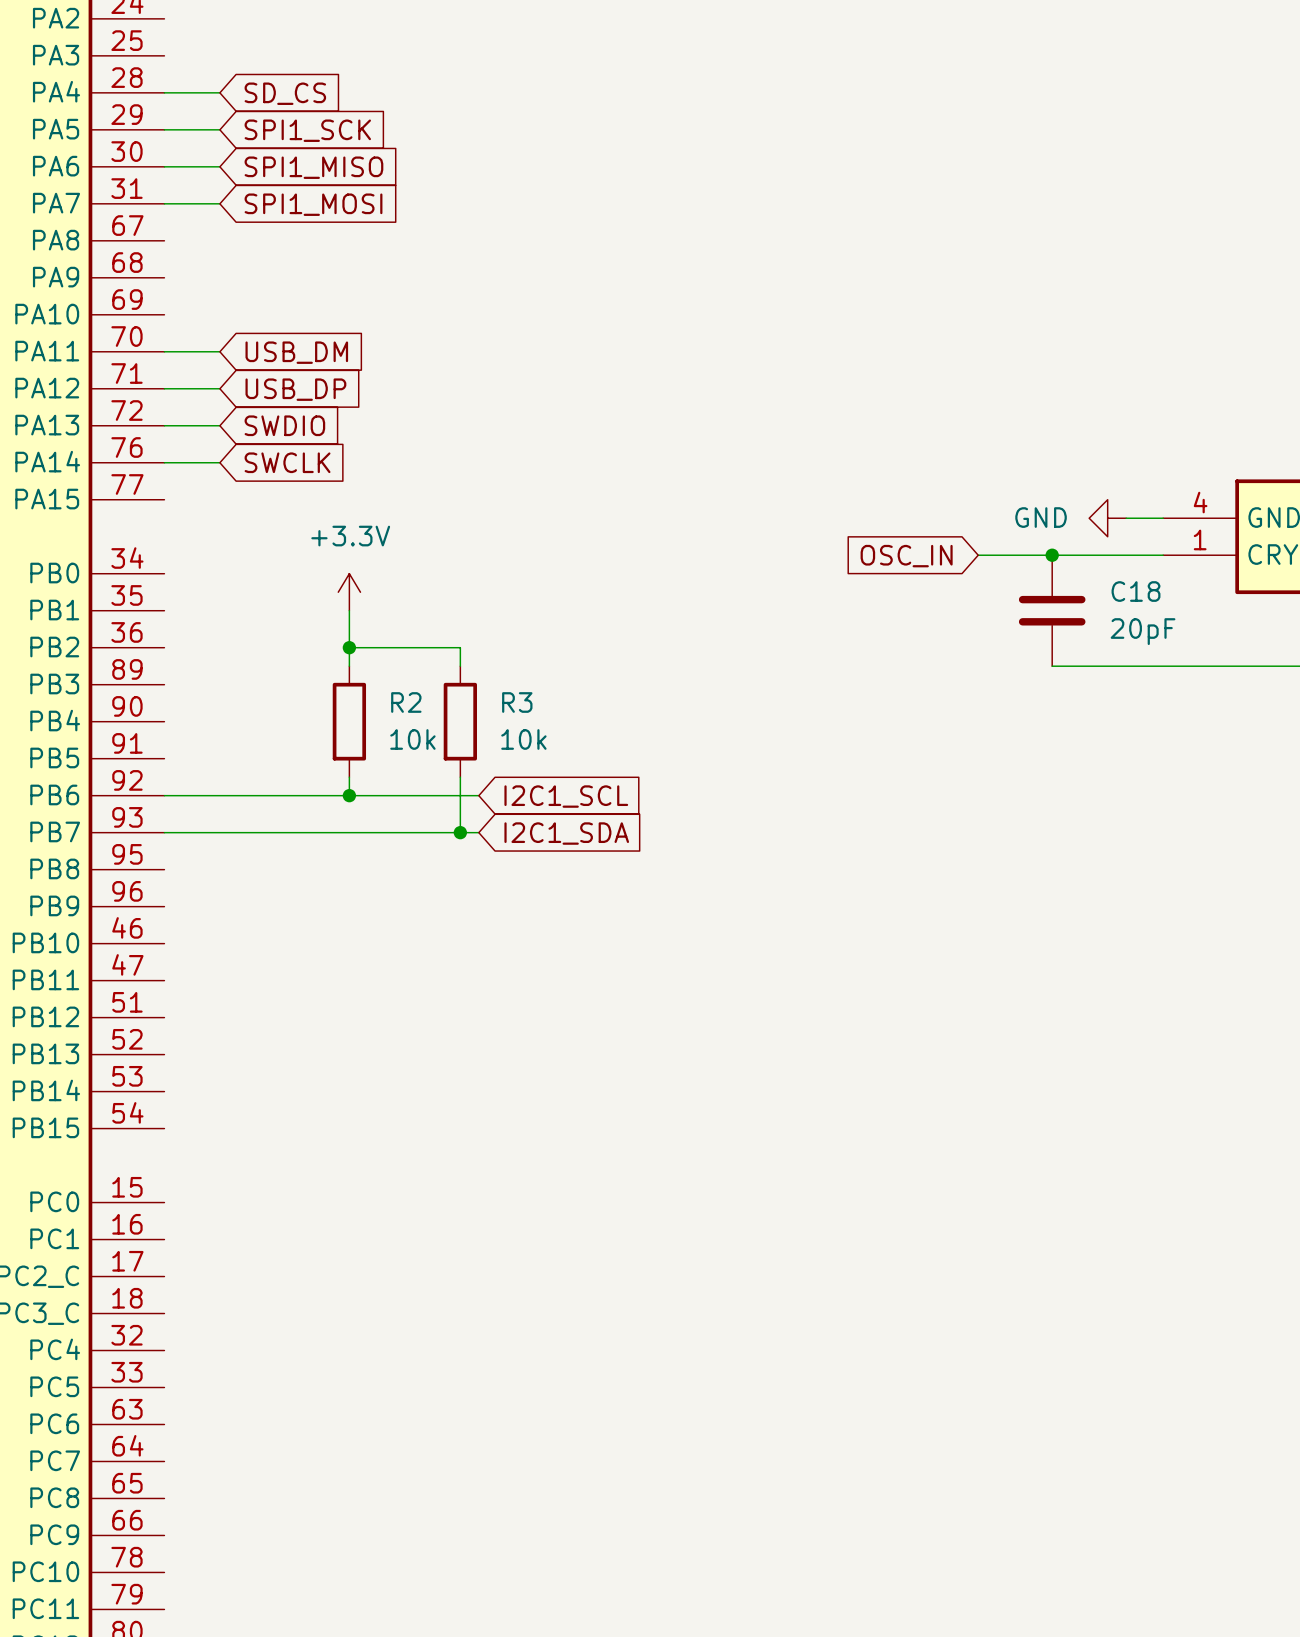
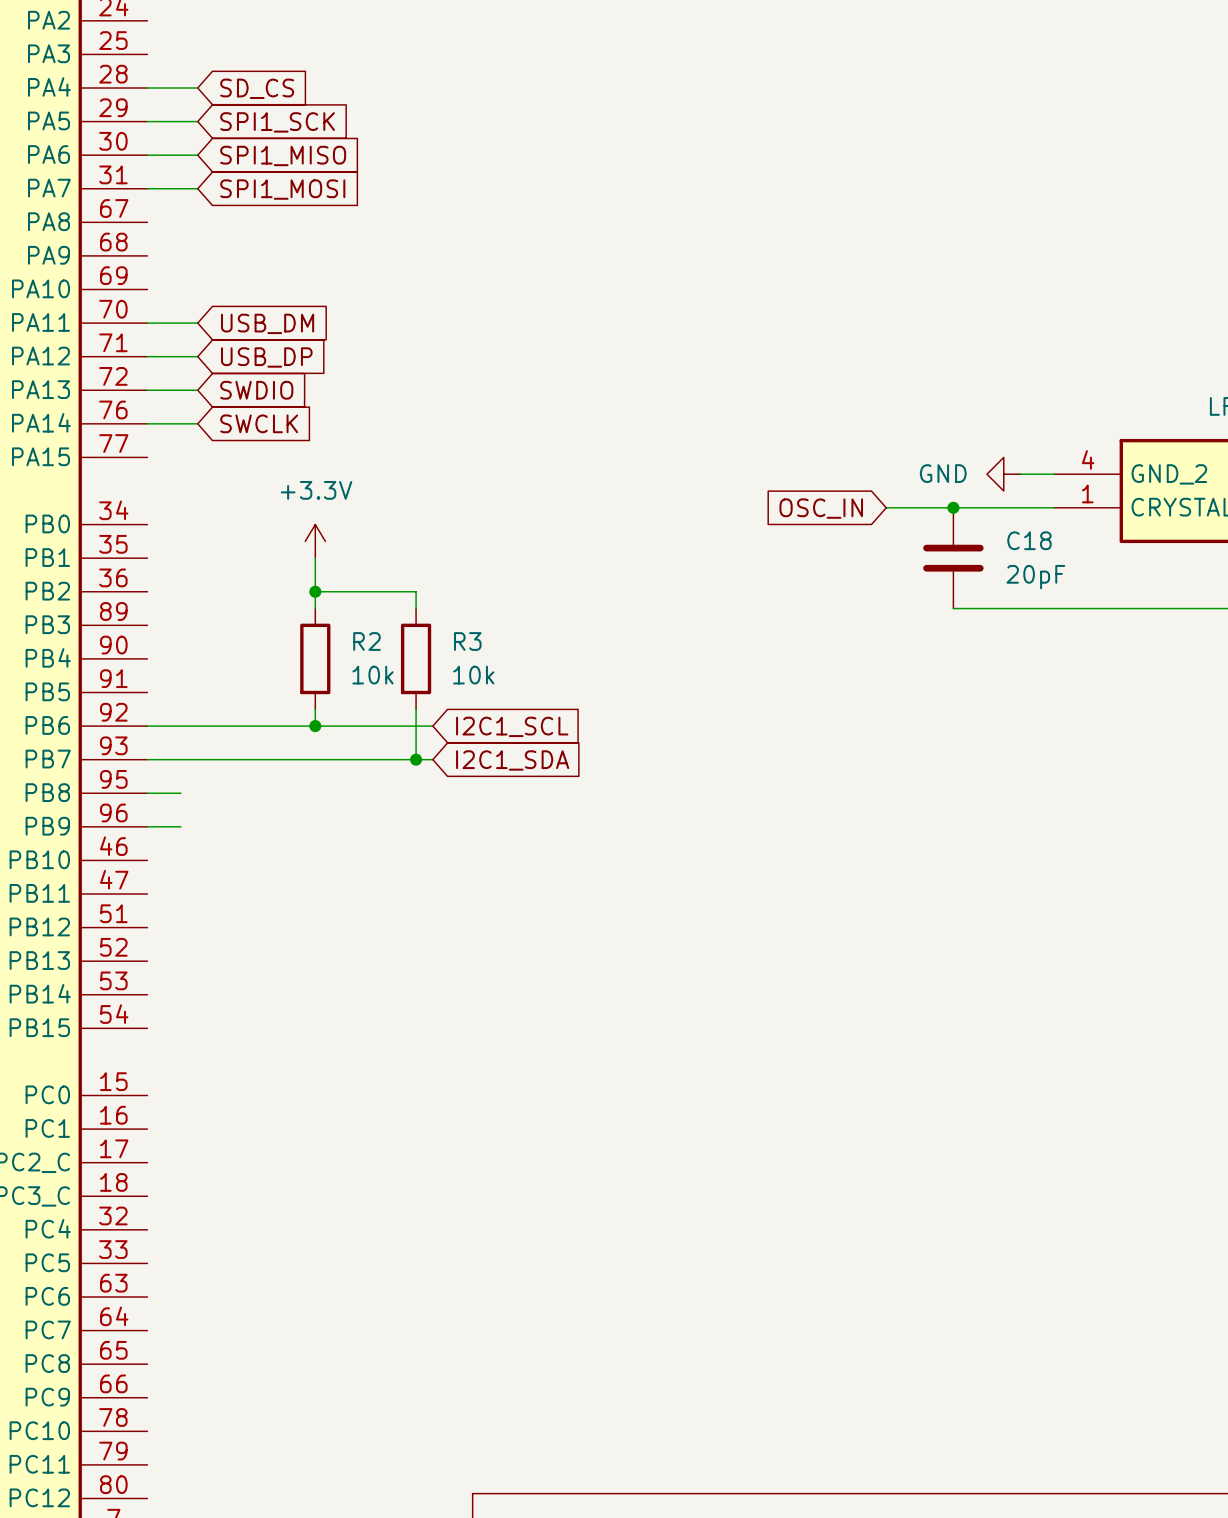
wire: none -> (147, 793) (180, 793)
wire: none -> (147, 826) (180, 826)

